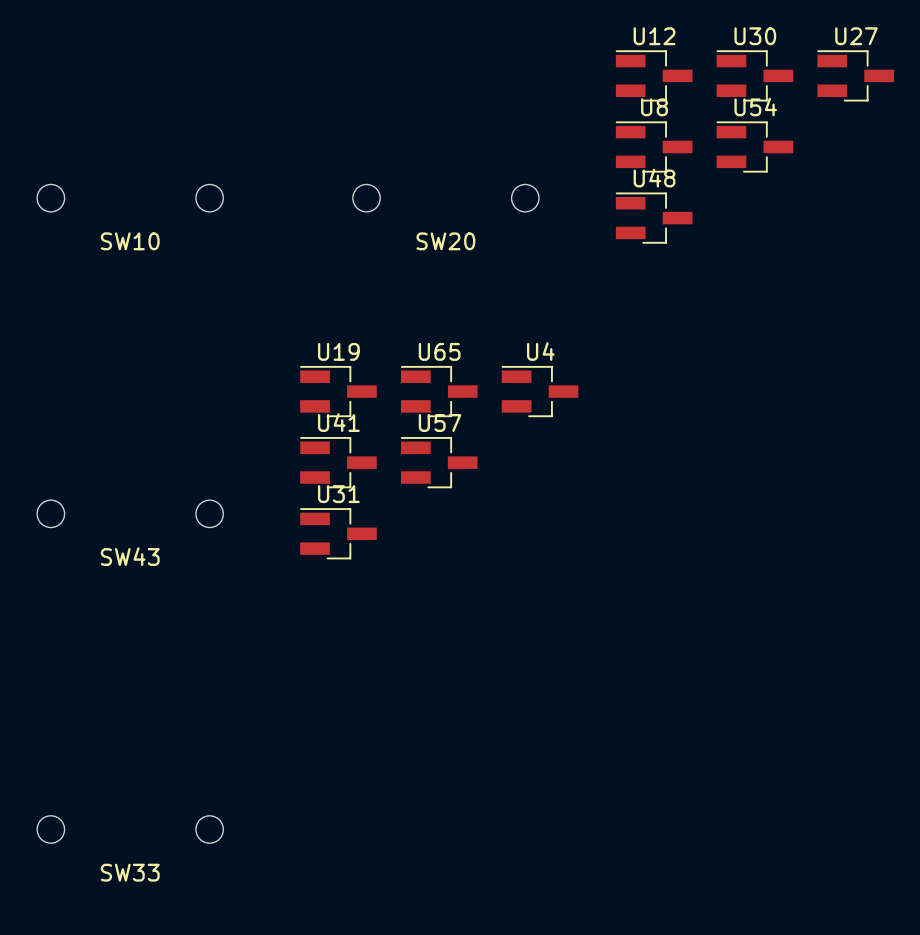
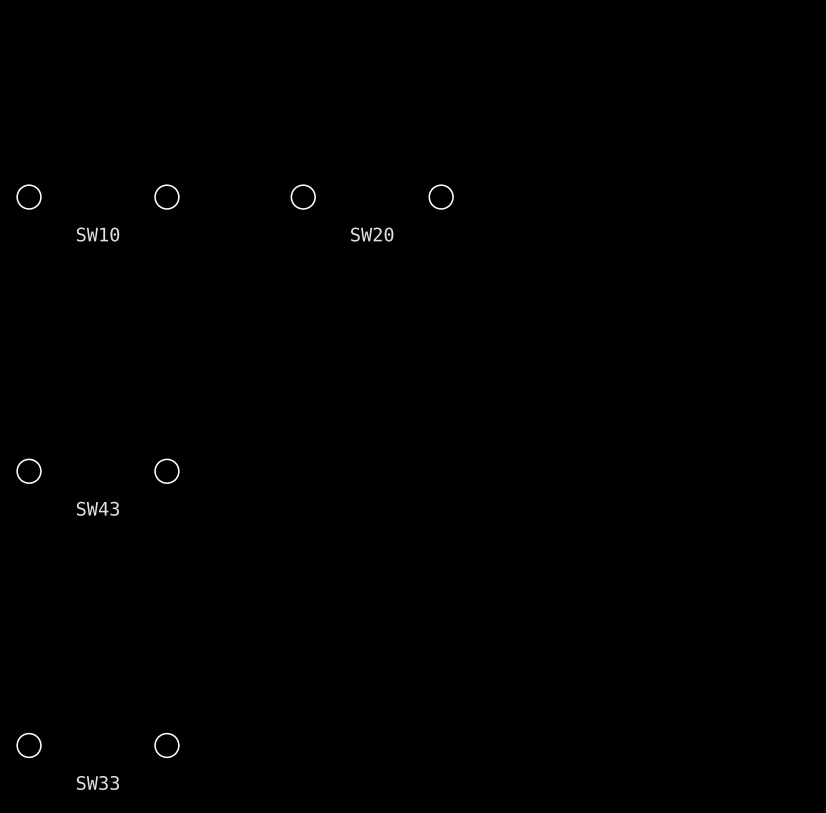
U12: (654, 75) -> none
U30: (754, 75) -> none
U27: (855, 75) -> none
U8: (654, 146) -> none
U54: (754, 146) -> none
U48: (654, 218) -> none
U19: (338, 391) -> none
U65: (439, 391) -> none
U4: (539, 391) -> none
U41: (338, 462) -> none
U57: (439, 462) -> none
U31: (338, 533) -> none

